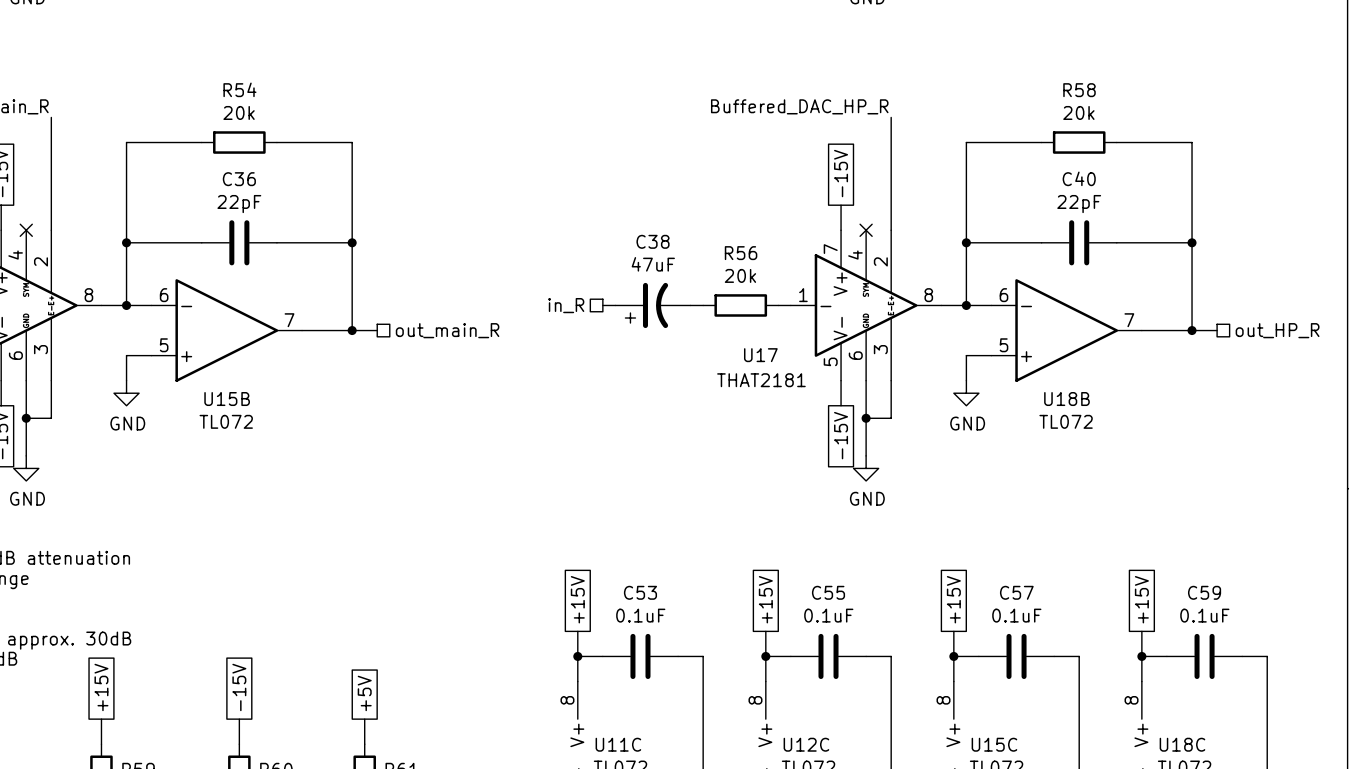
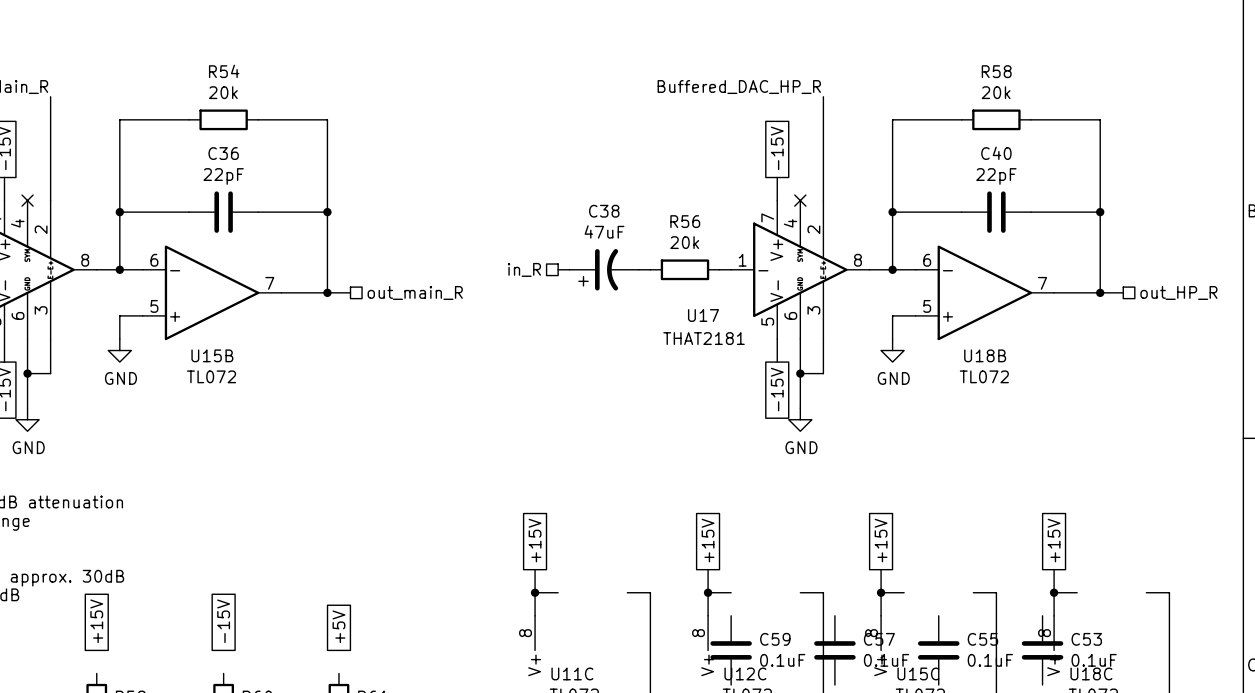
C53 value position: 0.1uF (640, 615) -> 0.1uF (1094, 660)
C55 value position: 0.1uF (828, 615) -> 0.1uF (990, 660)
C57 value position: 0.1uF (1016, 615) -> 0.1uF (886, 660)
C59 value position: 0.1uF (1204, 615) -> 0.1uF (782, 660)
C53 rotation: 0° (640, 656) -> 90° clockwise (1042, 650)
C53 position: (640, 656) -> (1042, 650)
C55 rotation: 0° (828, 656) -> 90° clockwise (938, 650)
C55 position: (828, 656) -> (938, 650)
C57 rotation: 0° (1016, 656) -> 90° clockwise (834, 650)
C57 position: (1016, 656) -> (834, 650)
C59 rotation: 0° (1204, 656) -> 90° clockwise (731, 650)
C59 position: (1204, 656) -> (731, 650)
wire: (101, 719) (101, 744) -> none
wire: (239, 719) (239, 744) -> none
wire: (364, 719) (364, 744) -> none

